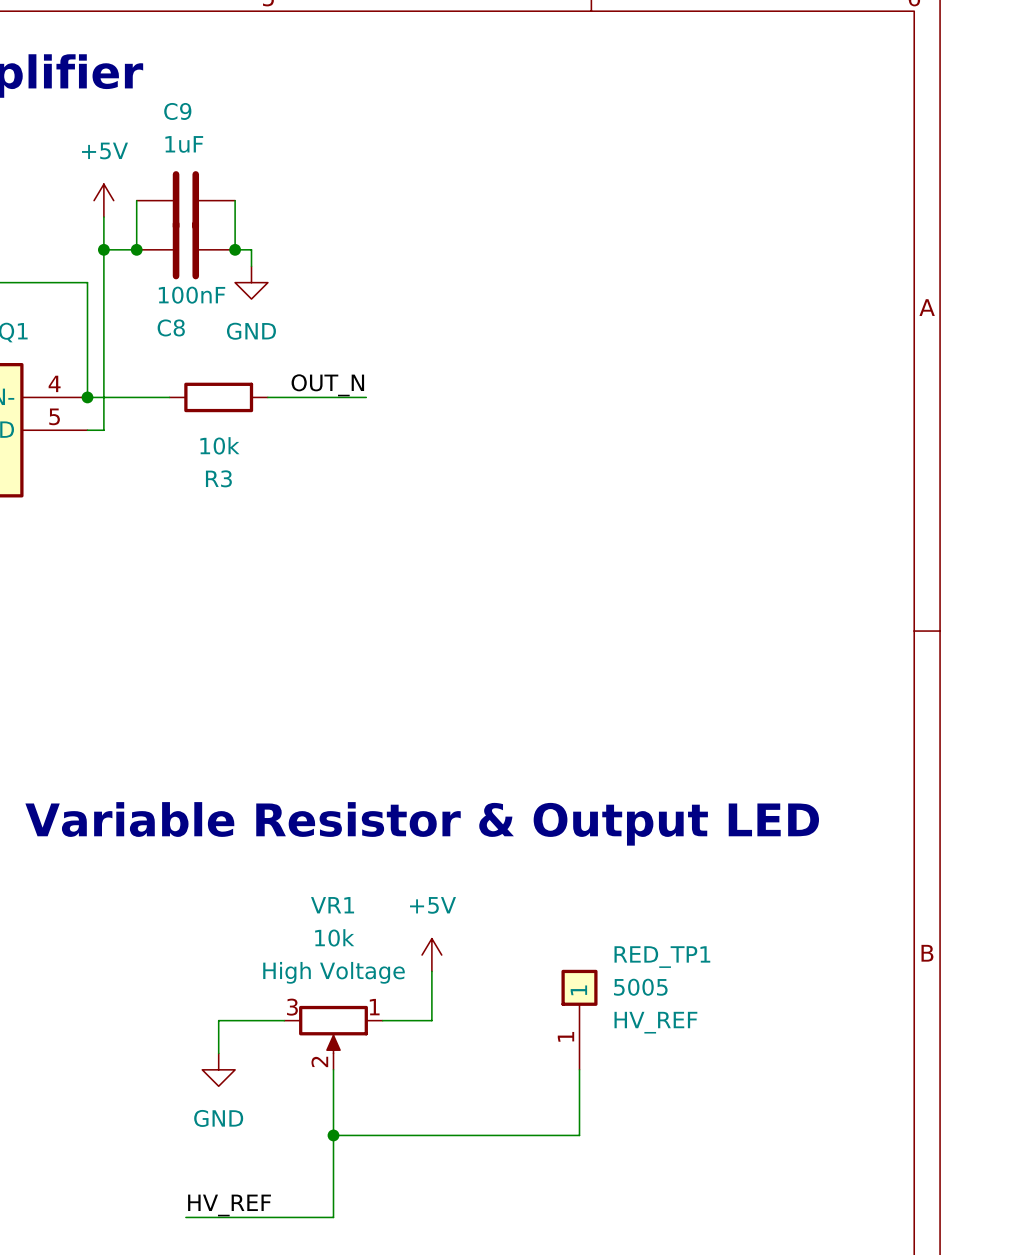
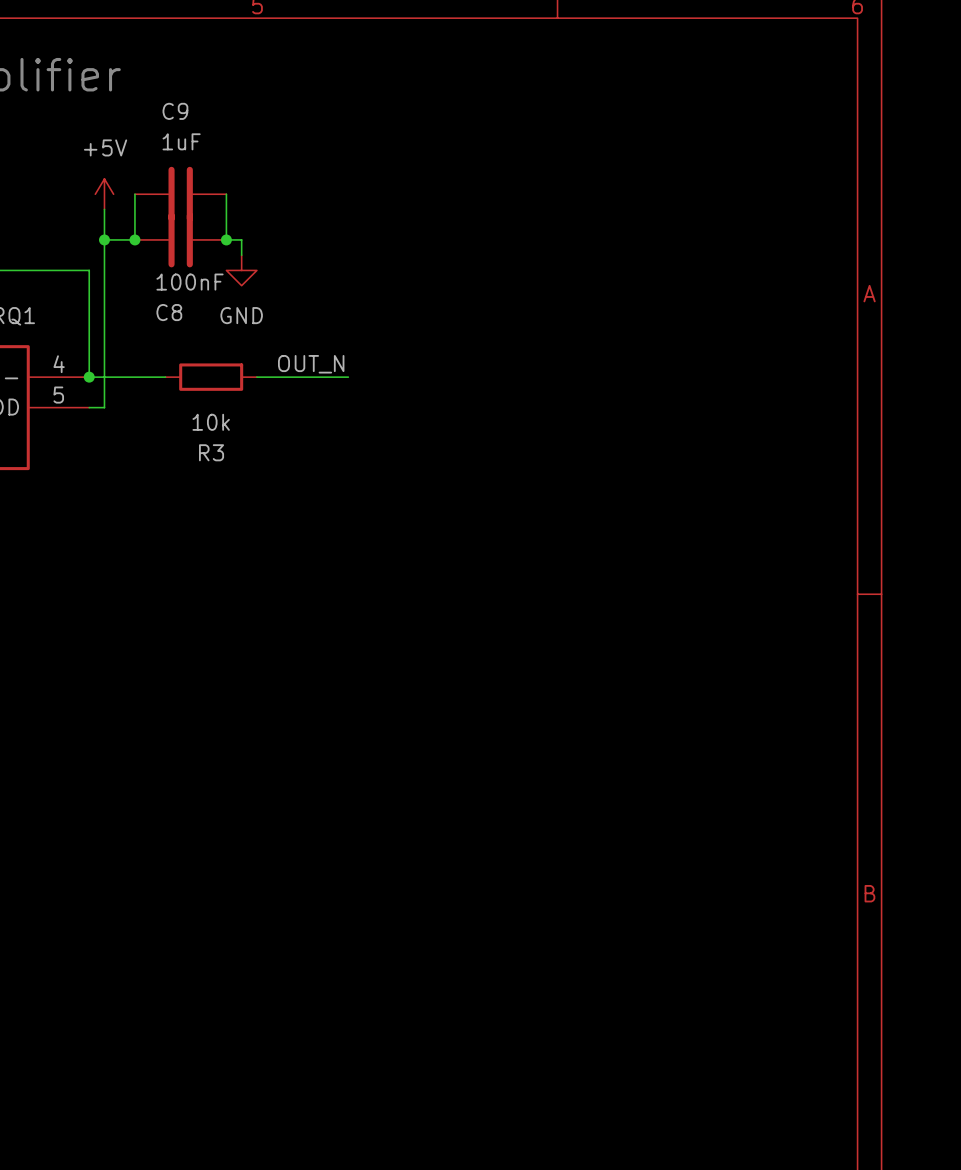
text: Variable Resistor & Output LED (422, 823) -> none
power symbol: +5V (431, 955) -> none
wire: (431, 971) (431, 1020) (382, 1020) -> none
RED_TP1: 5005 (579, 1019) -> none
wire: (284, 1020) (218, 1020) (218, 1053) -> none
VR1: 10k (333, 1037) -> none
power symbol: GND (218, 1069) -> none
wire: (333, 1069) (333, 1217) (185, 1217) -> none
wire: (579, 1069) (579, 1135) (333, 1135) -> none
junction: (333, 1135) -> none
label: HV_REF (229, 1205) -> none

